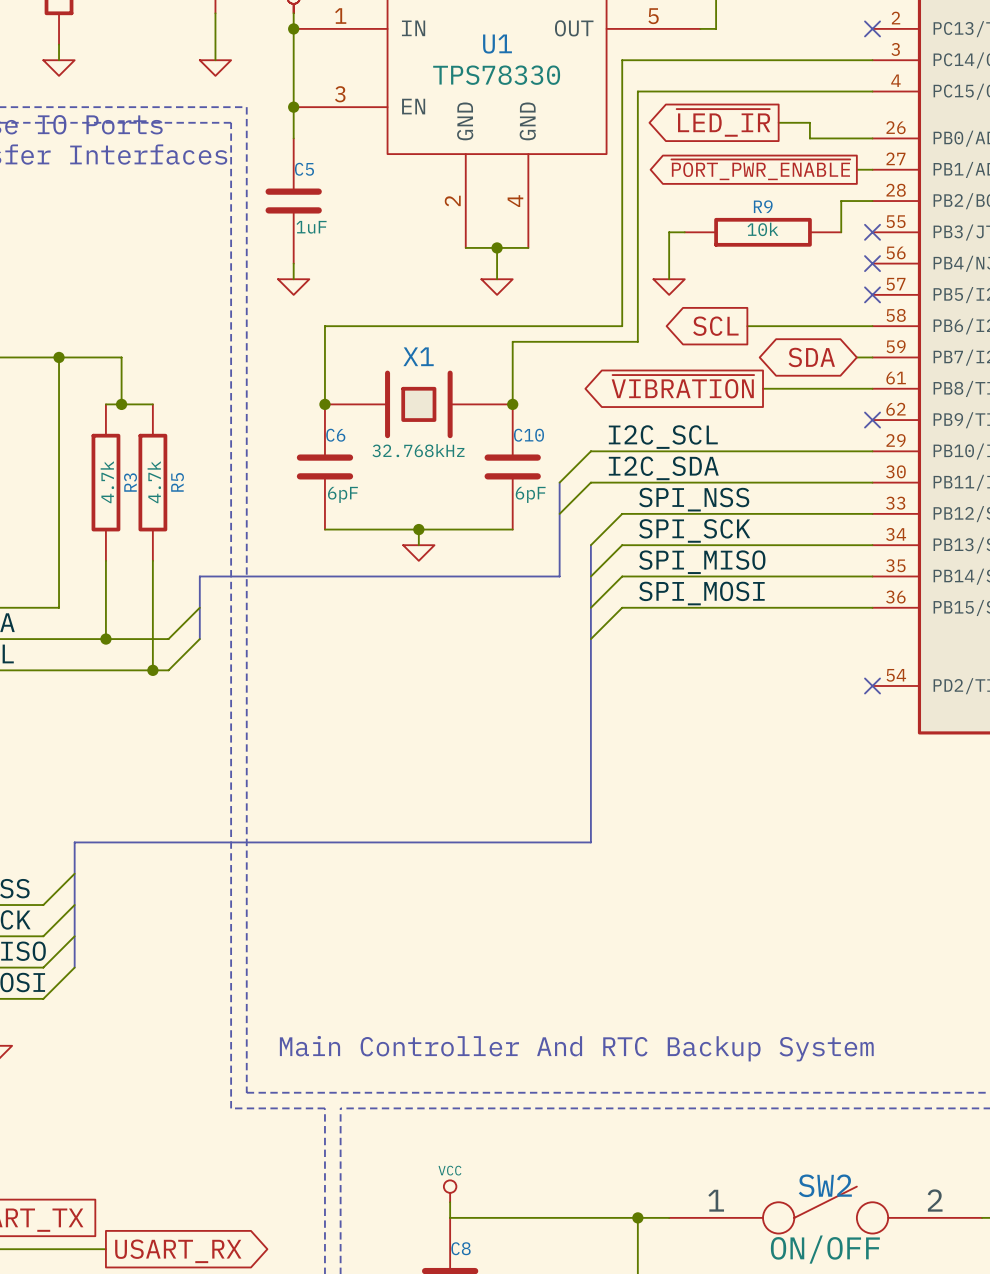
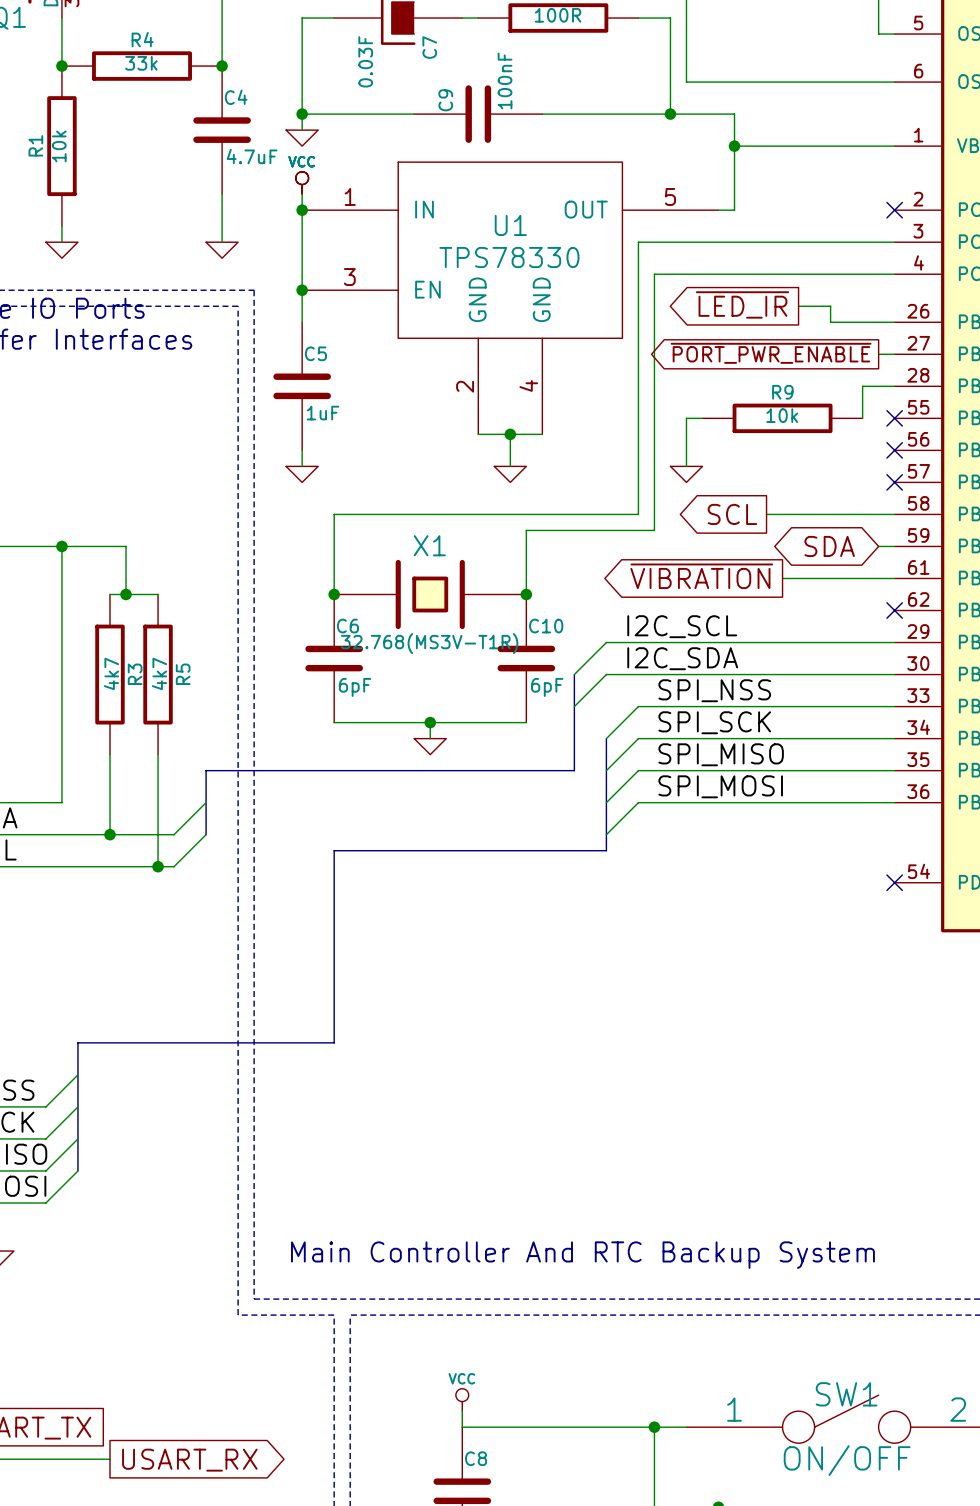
X1 value: 32.768kHz (418, 450) -> 32.768(MS3V-T1R) (429, 643)
R3 value: 4.7k (107, 482) -> 4k7 (111, 673)
R5 value: 4.7k (154, 482) -> 4k7 (159, 673)
bus: (590, 654) (590, 842) (324, 842) -> (606, 850) (334, 850) (334, 1042)
SW2 name: SW2 (825, 1185) -> SW1 (846, 1394)

